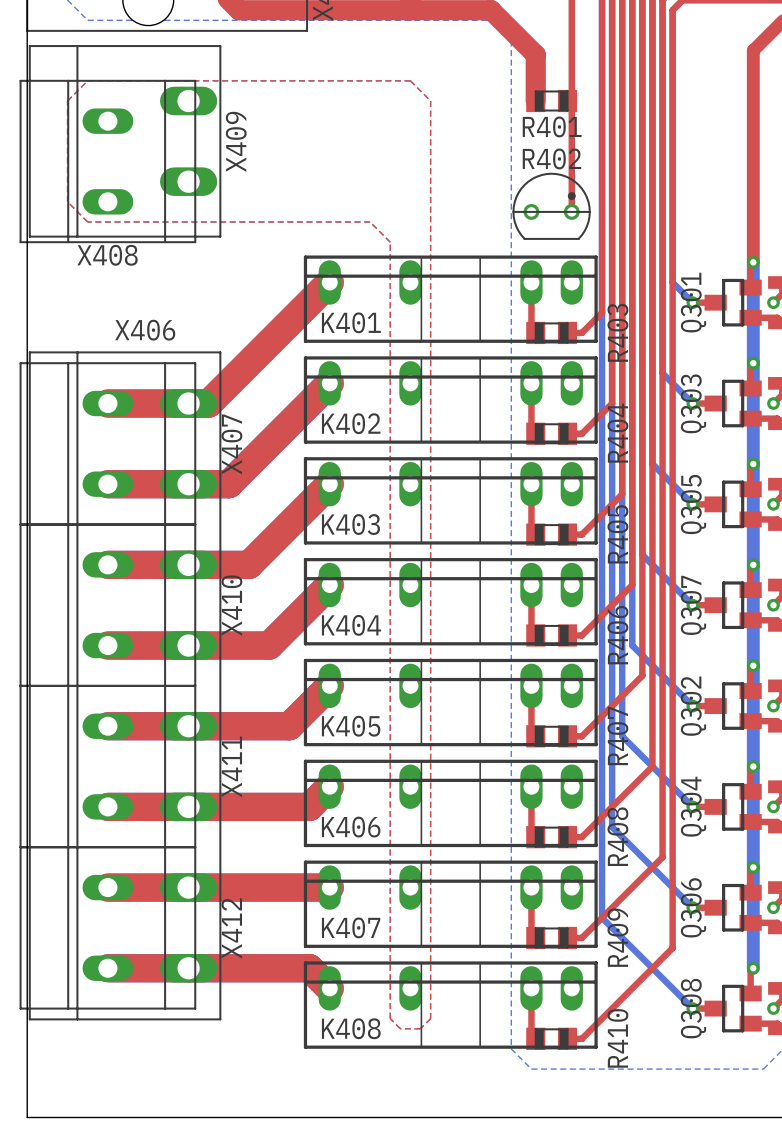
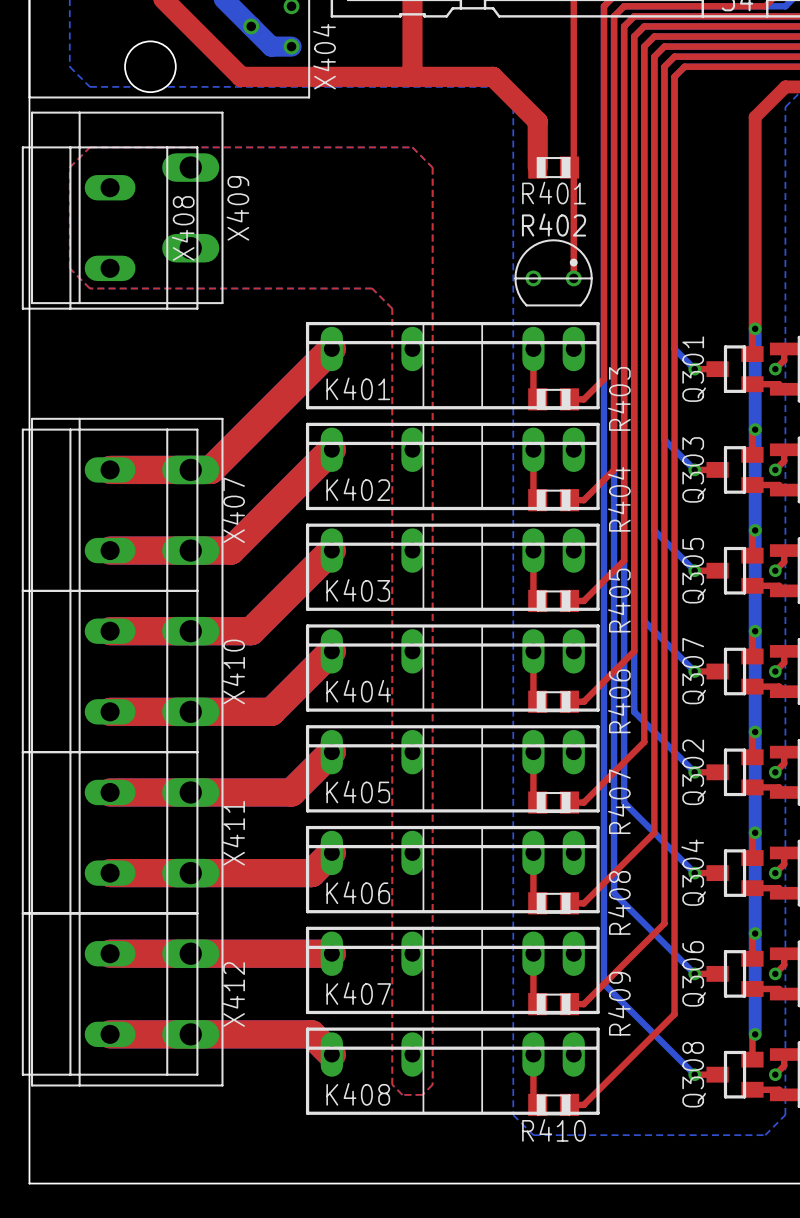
X408 name rotation: 0° (107, 255) -> 90° counterclockwise (183, 228)
X408 name position: X408 (107, 255) -> X408 (183, 228)
X406 name: X406 (145, 330) -> none
R410 name rotation: 0° (617, 1038) -> 90° clockwise (554, 1130)

